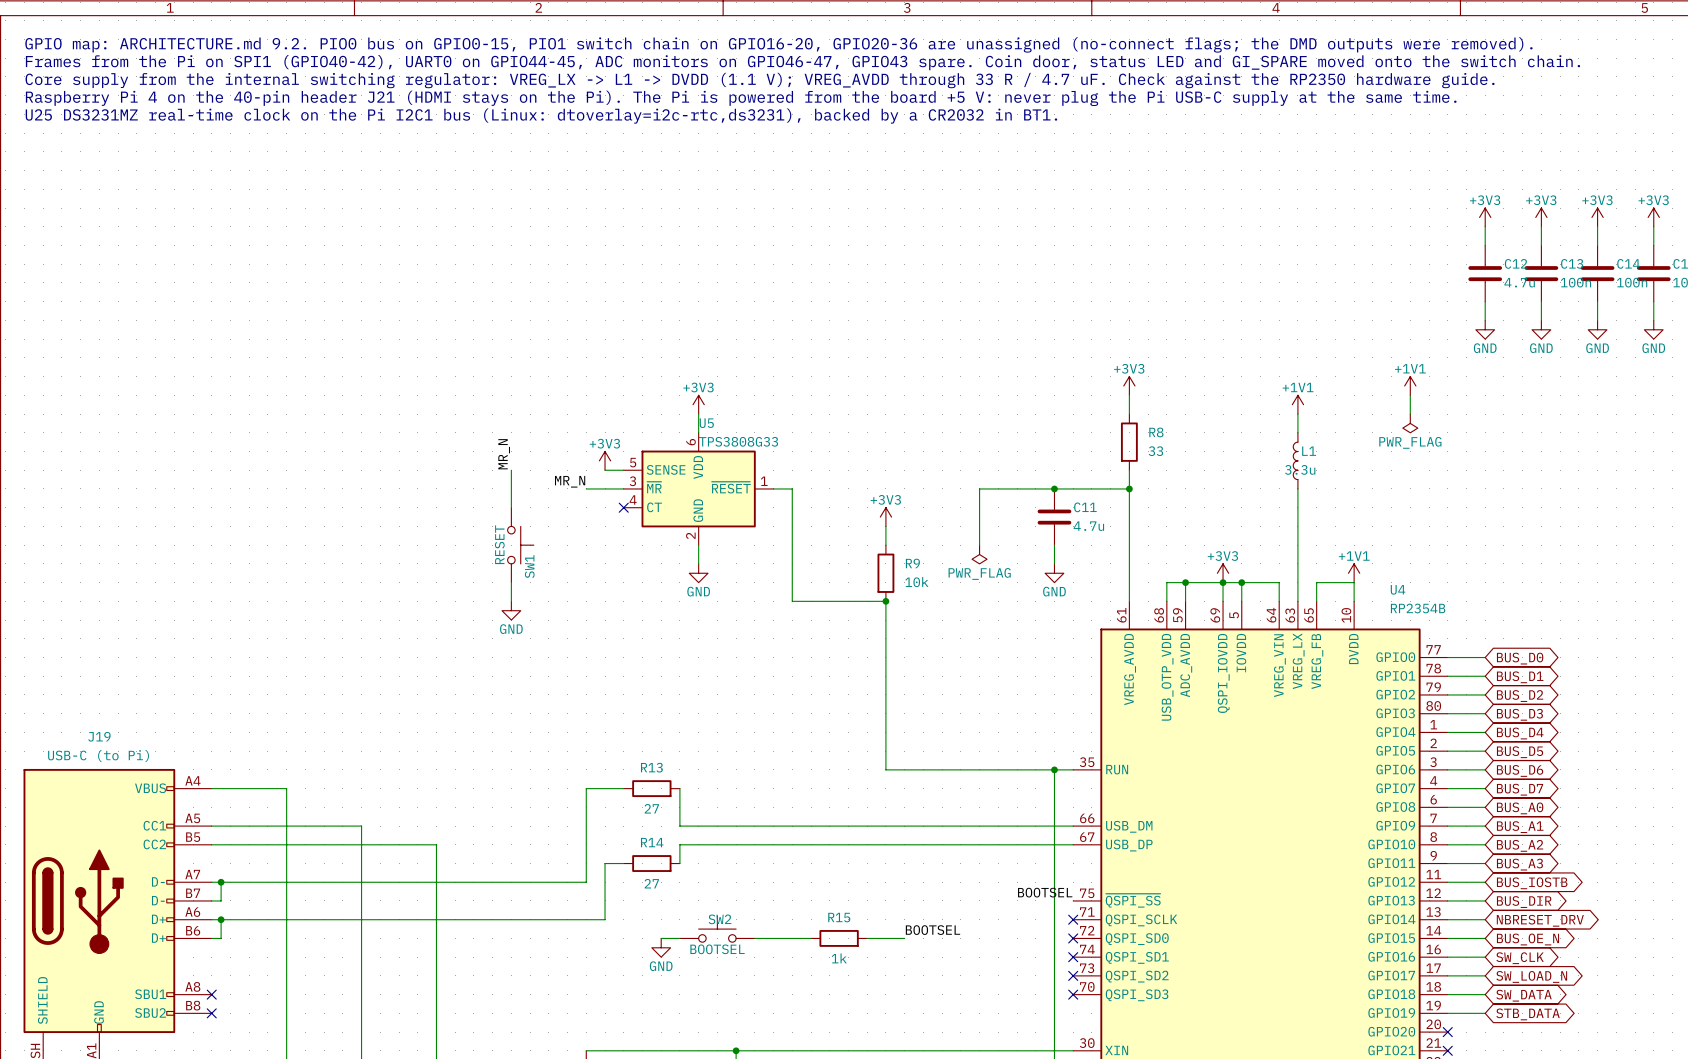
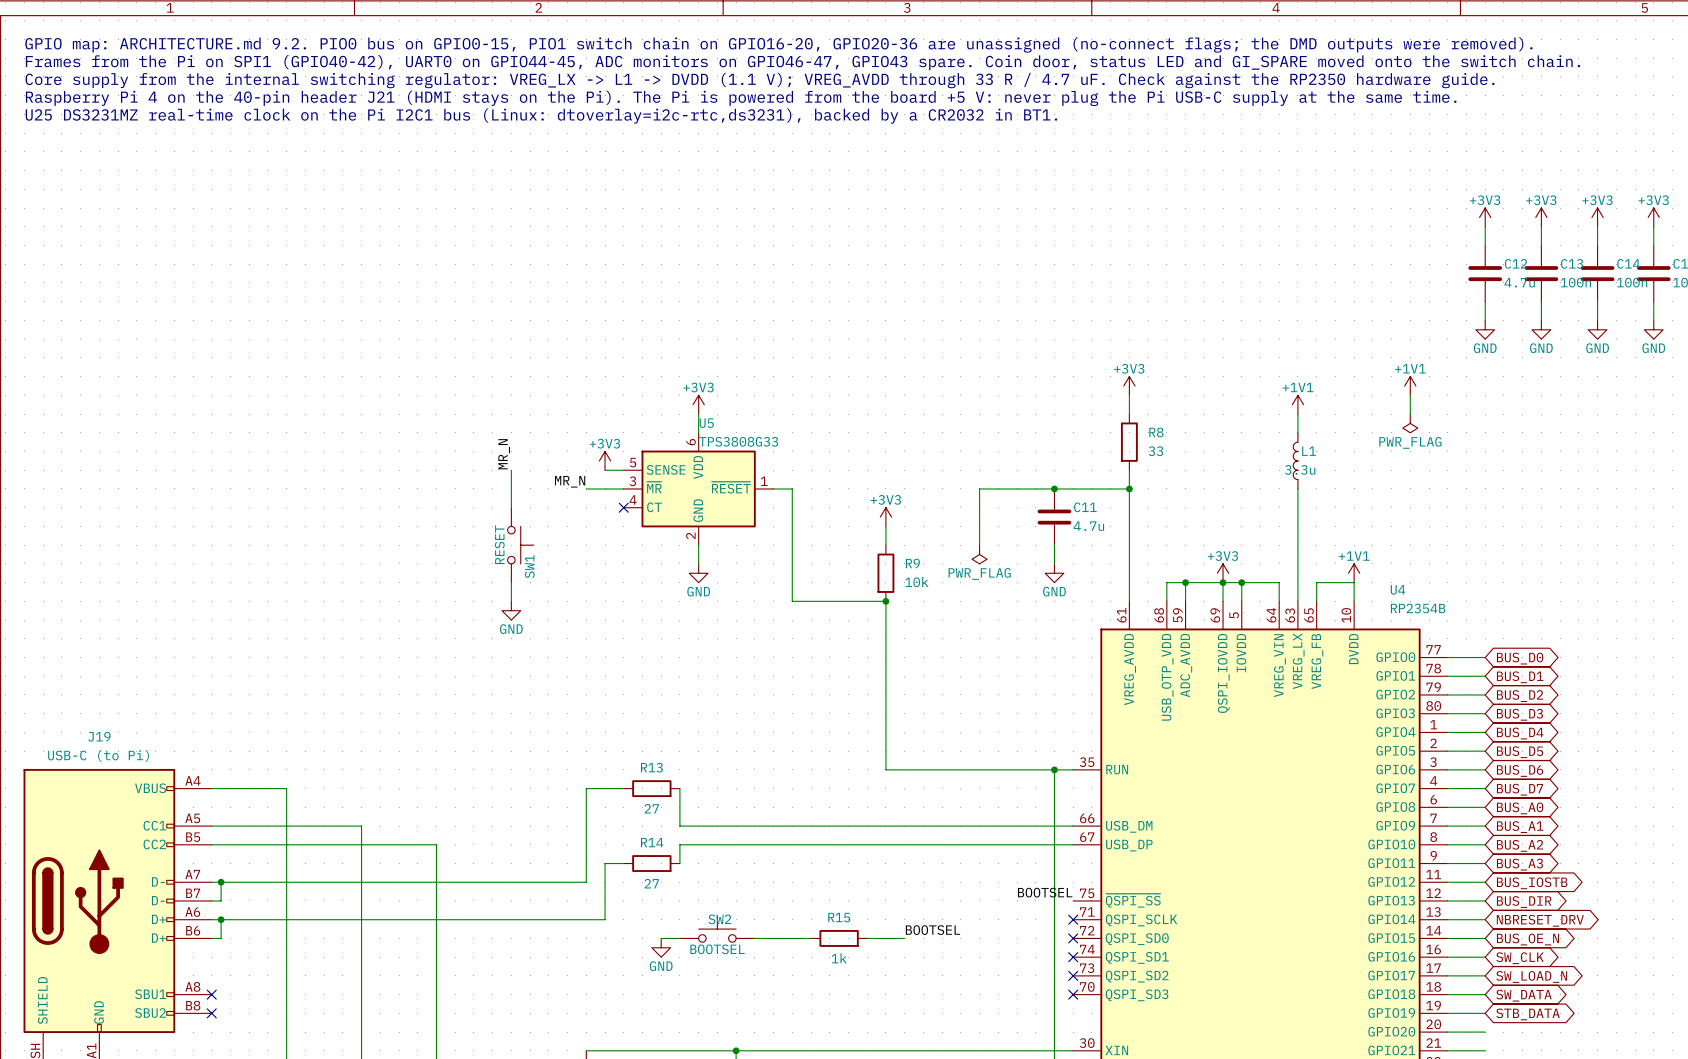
wire: none -> (1447, 1032) (1485, 1032)
no-connect mark: (1447, 1032) -> none
wire: none -> (1447, 1050) (1485, 1050)
no-connect mark: (1447, 1050) -> none

